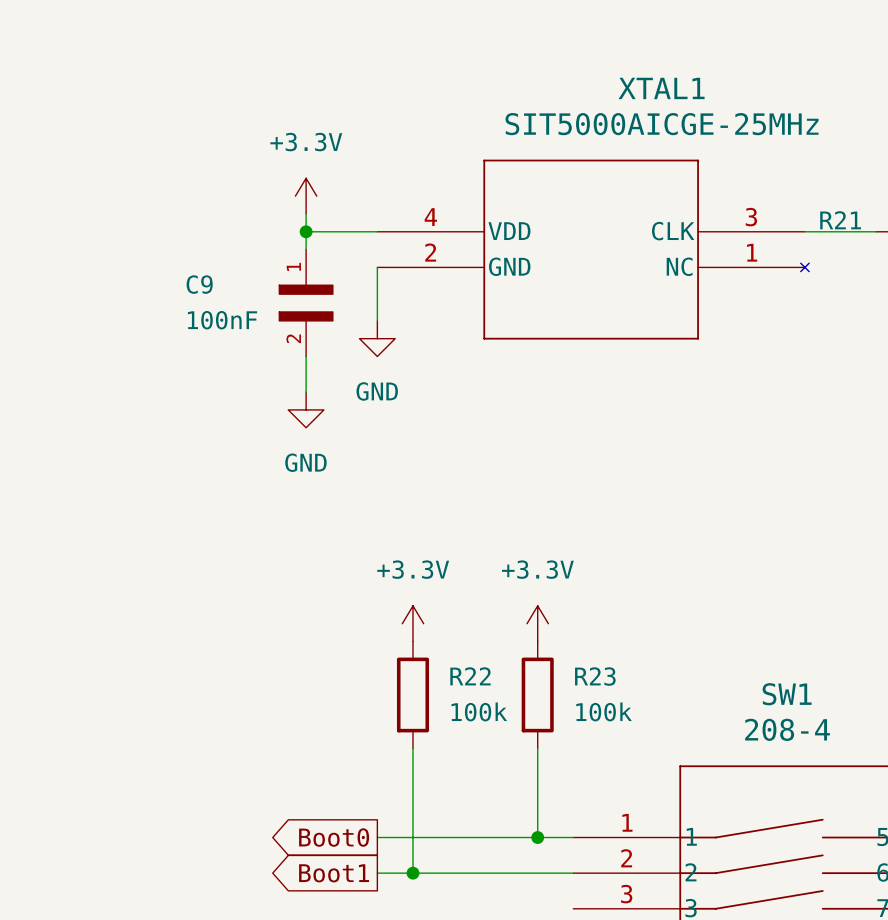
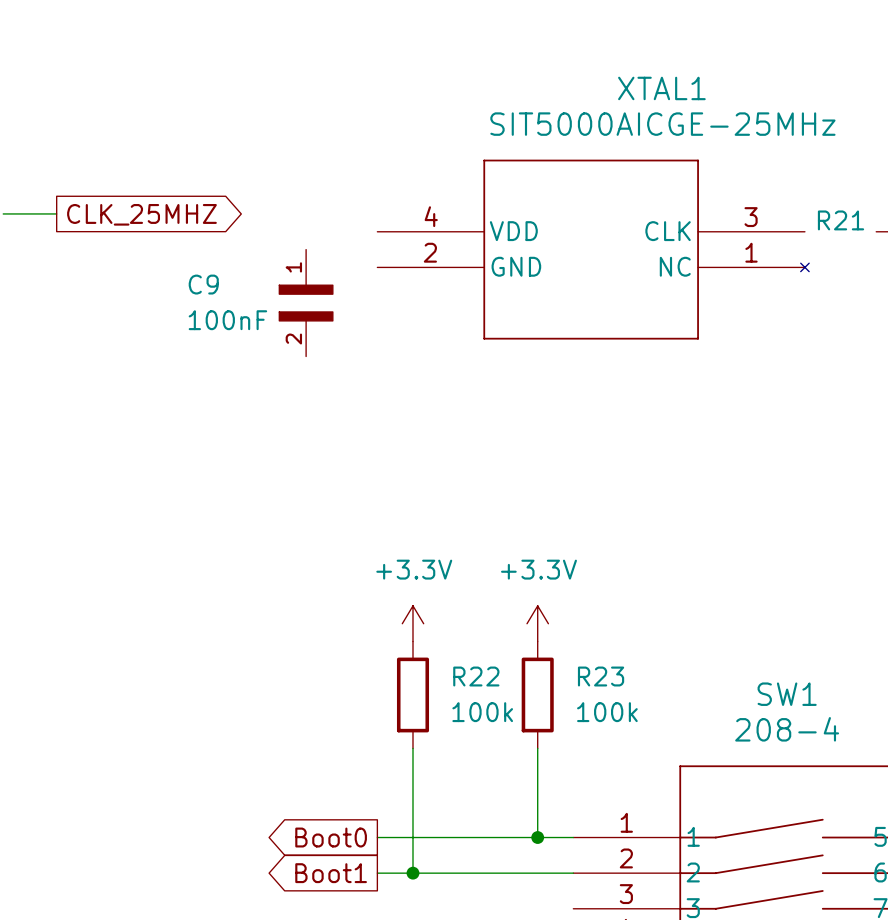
power symbol: +3.3V (306, 196) -> none
wire: none -> (3, 213) (56, 213)
wire: (306, 213) (306, 249) -> none
global label: none -> CLK_25MHZ (141, 214)
wire: (306, 231) (377, 231) -> none
junction: (306, 231) -> none
wire: (804, 231) (876, 231) -> none
wire: (377, 267) (377, 320) -> none
power symbol: GND (377, 338) -> none
wire: (306, 356) (306, 392) -> none
power symbol: GND (306, 409) -> none

